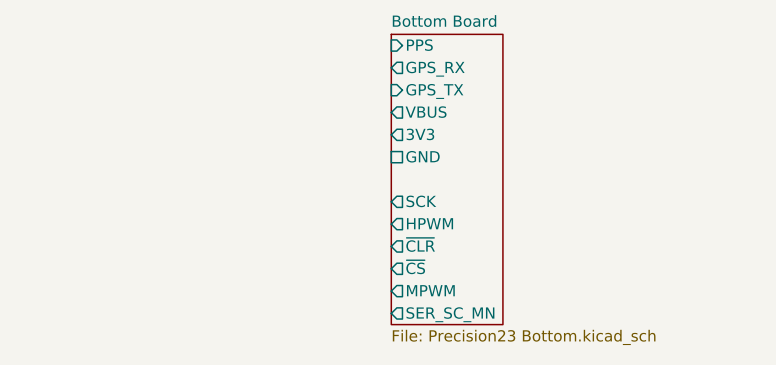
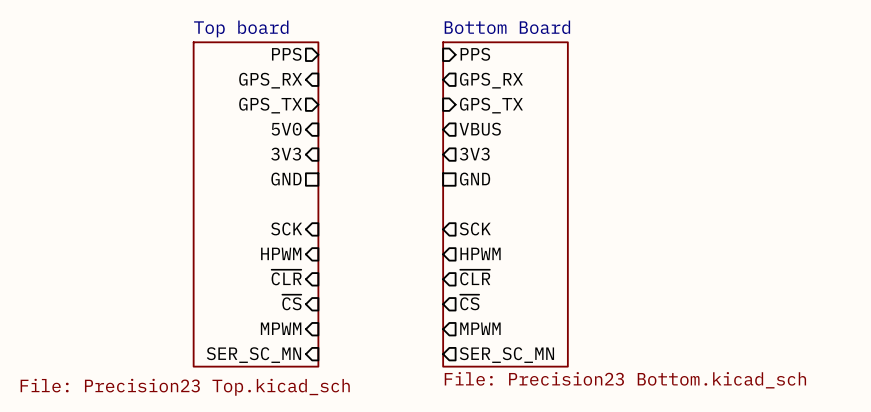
sheet pin: none -> PPS (286, 54)
sheet pin: none -> GPS_RX (270, 80)
sheet pin: none -> GPS_TX (270, 105)
sheet pin: none -> 5V0 (286, 129)
sheet pin: none -> 3V3 (286, 154)
sheet pin: none -> GND (286, 179)
sheet Top board: none -> File: Precision23 Top.kicad_sch (256, 204)
sheet pin: none -> SCK (286, 228)
sheet pin: none -> HPWM (281, 253)
sheet pin: none -> ~{CLR} (286, 277)
sheet pin: none -> ~{CS} (291, 302)
sheet pin: none -> MPWM (281, 328)
sheet pin: none -> SER_SC_MN (253, 355)

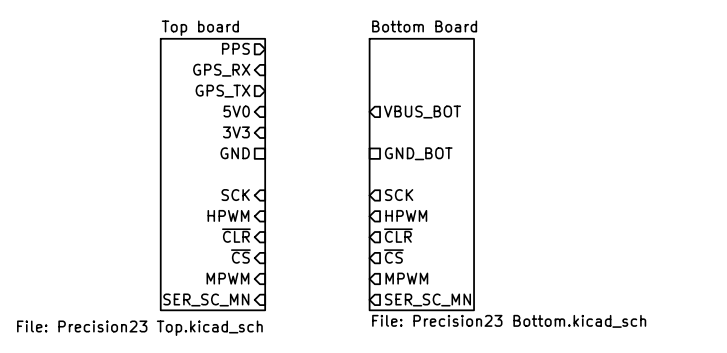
sheet pin: PPS (475, 54) -> none
sheet pin: GPS_RX (491, 80) -> none
sheet pin: GPS_TX (491, 105) -> none
sheet pin: VBUS (480, 129) -> VBUS_BOT (422, 112)
sheet pin: 3V3 (474, 154) -> none
sheet pin: GND (475, 179) -> GND_BOT (418, 153)

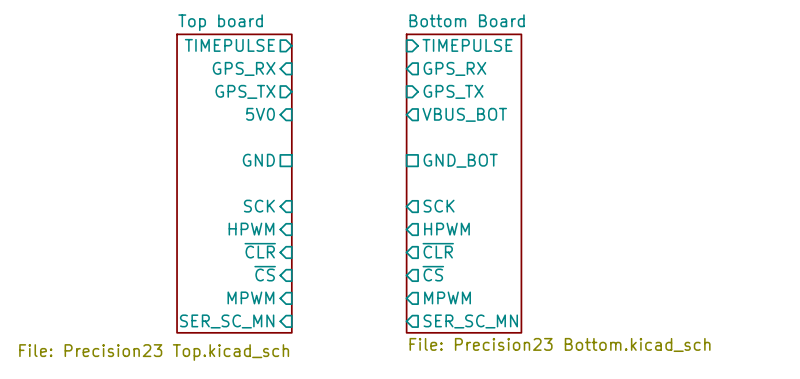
sheet pin: PPS (235, 48) -> TIMEPULSE (229, 45)
sheet pin: none -> TIMEPULSE (467, 45)
sheet pin: none -> GPS_RX (454, 68)
sheet pin: none -> GPS_TX (453, 91)
sheet pin: 3V3 (236, 132) -> none

